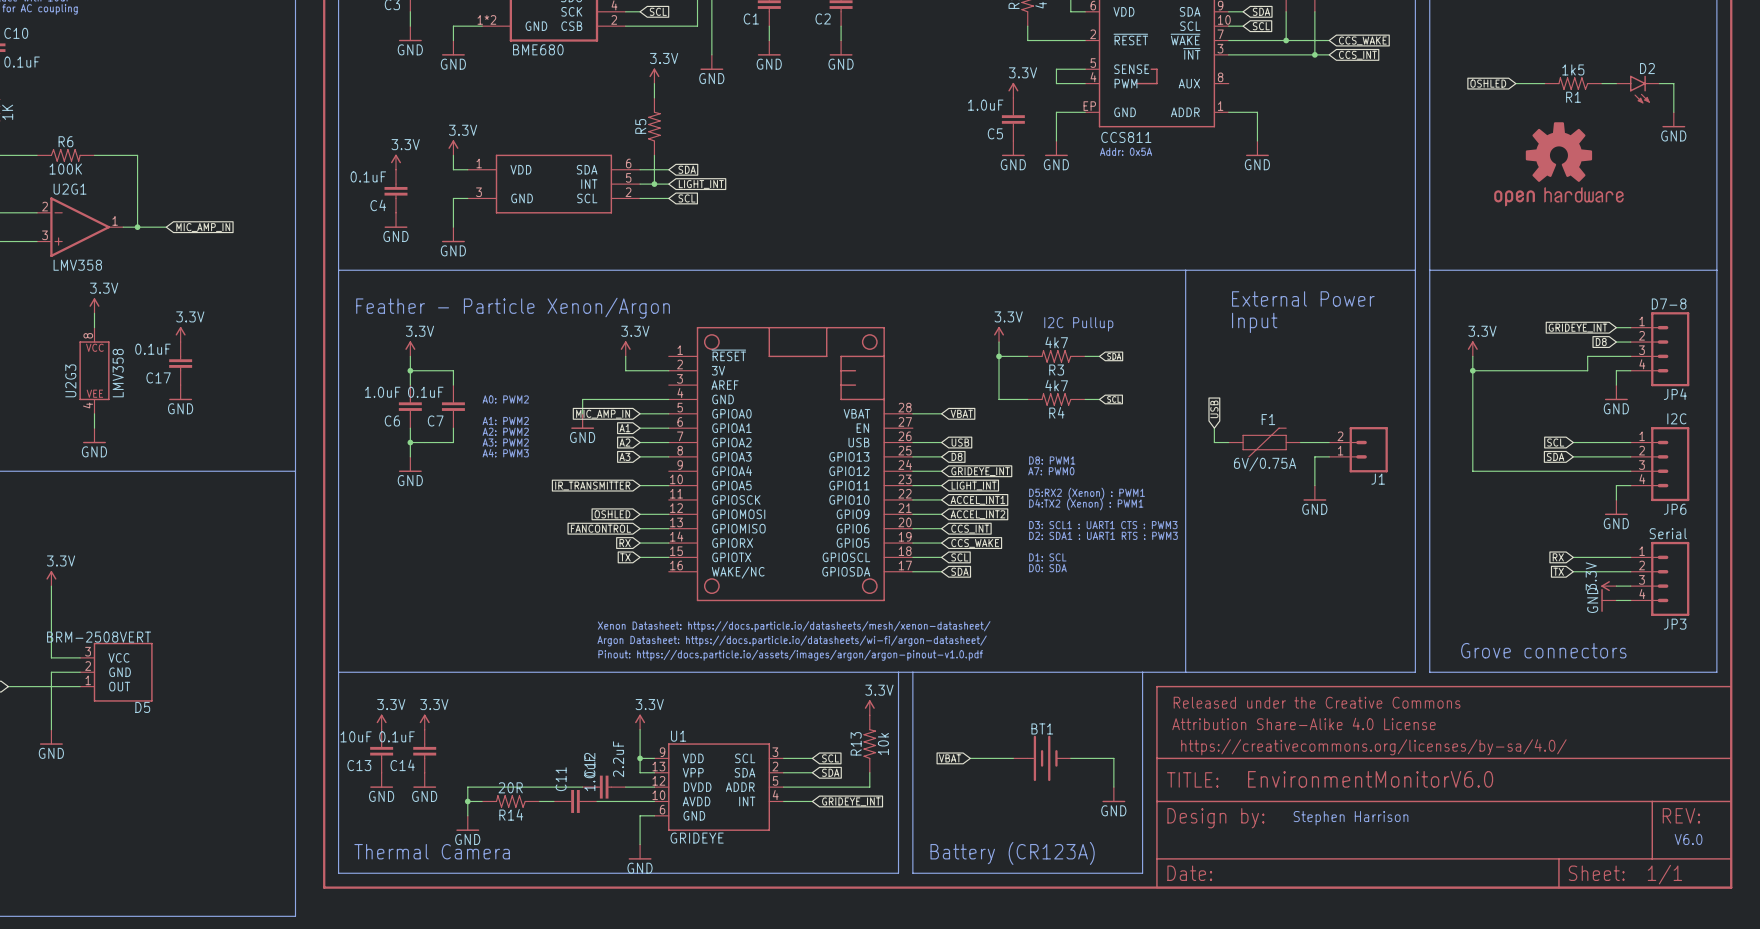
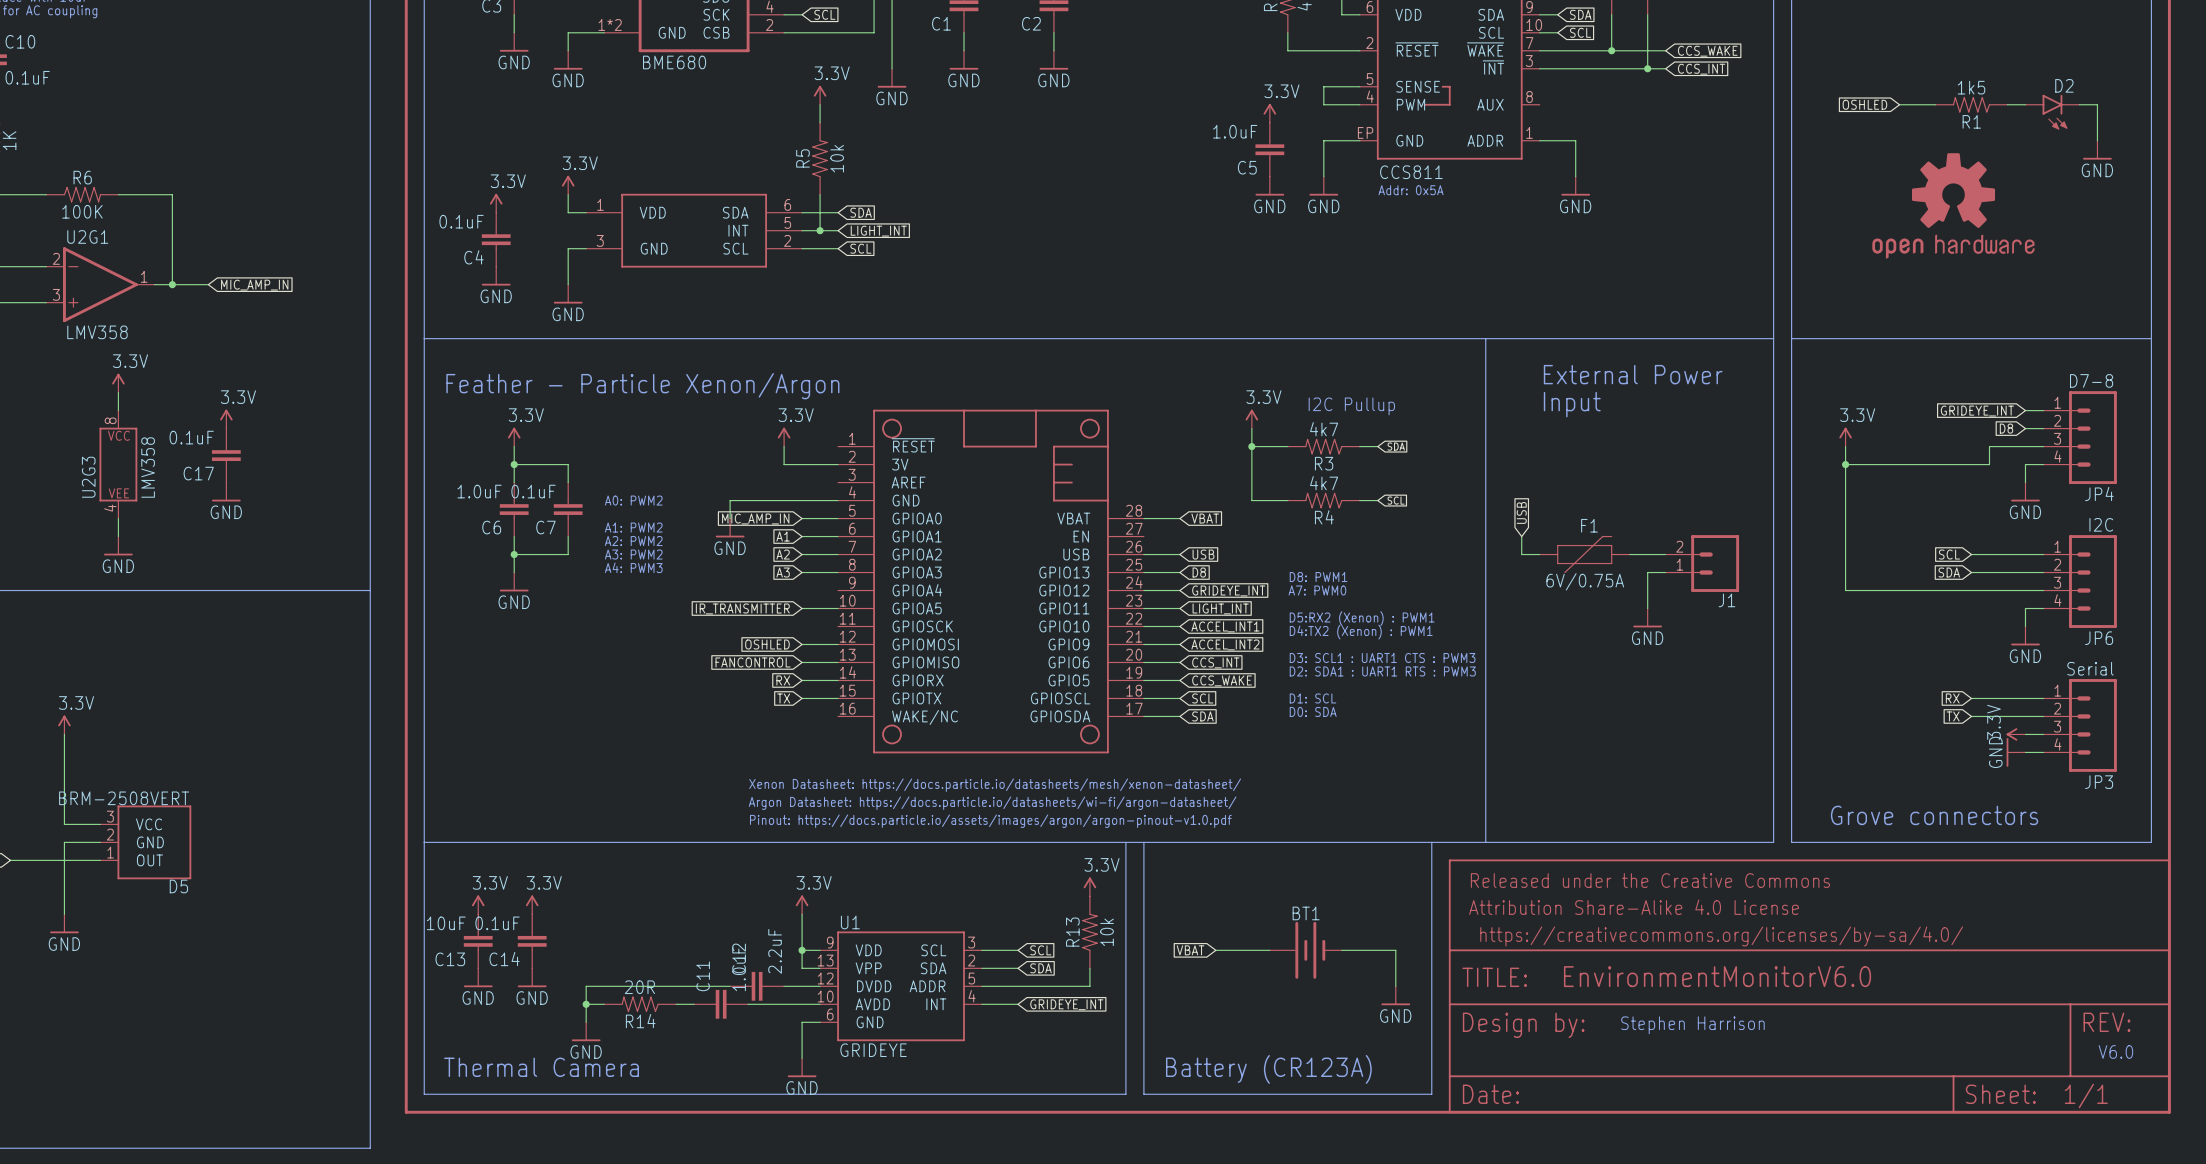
R5 value: none -> 10k (837, 158)

